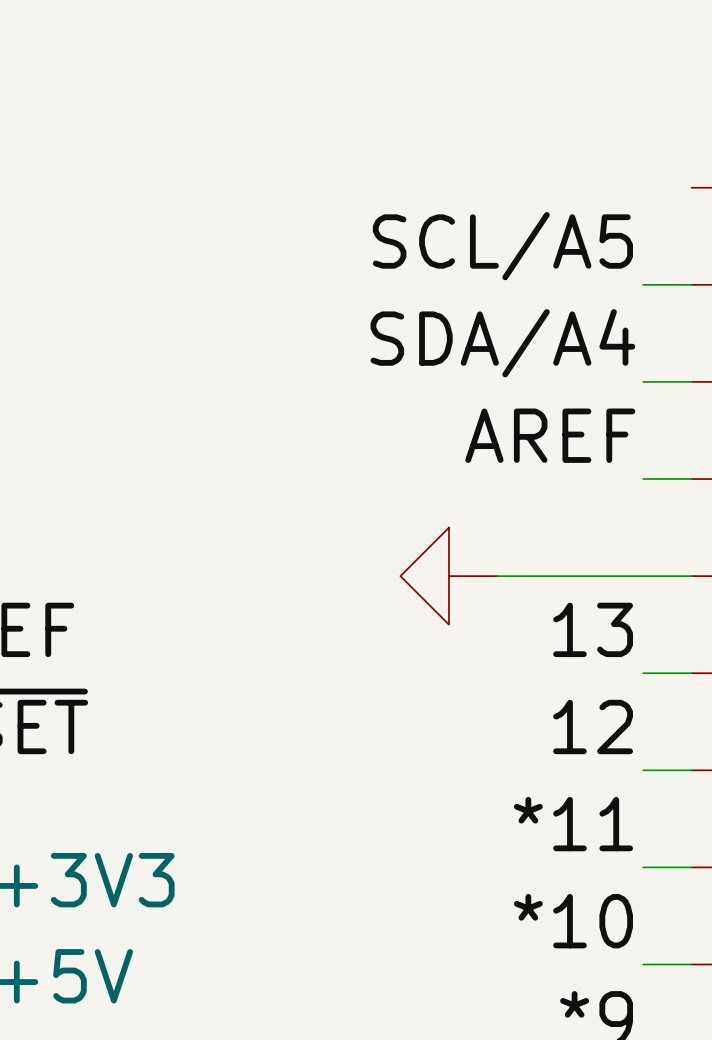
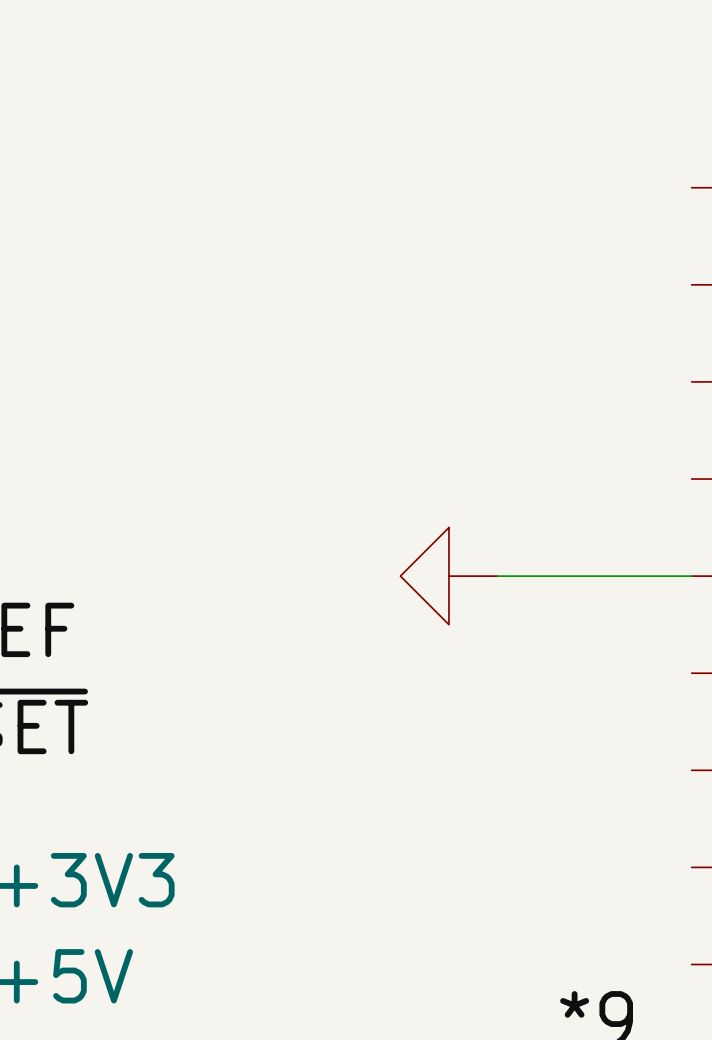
label: SCL/A5 (502, 246) -> none
wire: (643, 284) (691, 284) -> none
label: SDA/A4 (502, 343) -> none
wire: (643, 381) (691, 381) -> none
label: AREF (550, 435) -> none
wire: (643, 479) (691, 479) -> none
label: 13 (593, 629) -> none
wire: (643, 673) (691, 673) -> none
label: 12 (593, 726) -> none
wire: (643, 770) (691, 770) -> none
label: *11 (573, 824) -> none
wire: (643, 867) (691, 867) -> none
label: *10 (573, 921) -> none
wire: (643, 964) (691, 964) -> none

